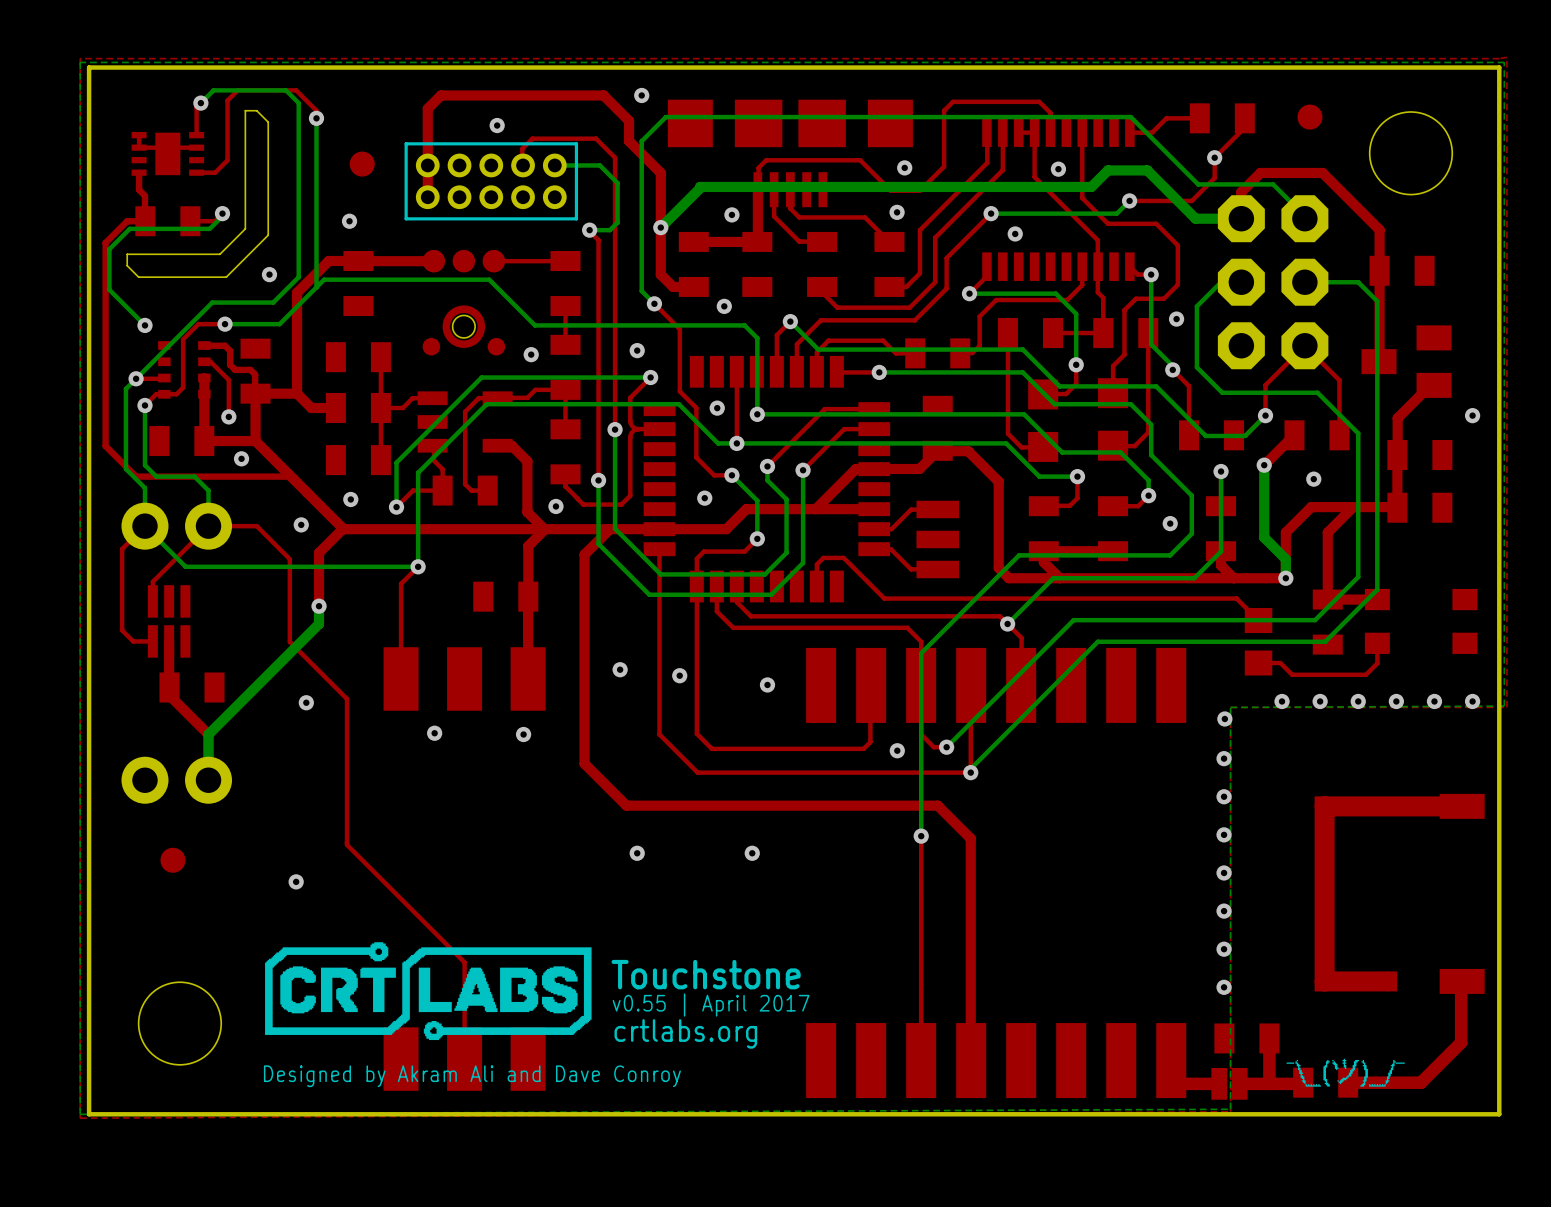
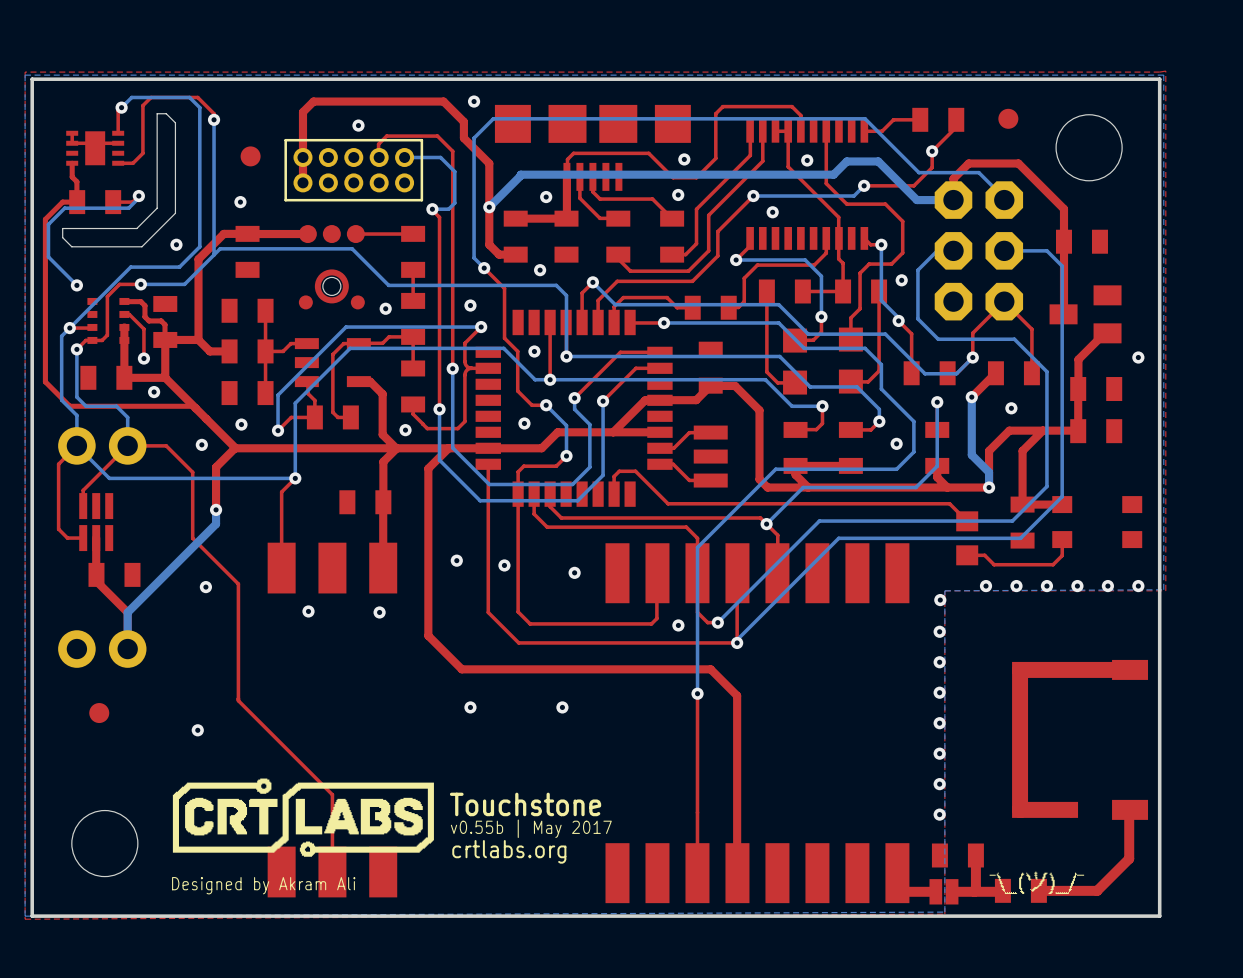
text: v0.55 | April 2017 (711, 1005) -> v0.55b | May 2017 (531, 828)
text: Designed by Akram Ali and Dave Conroy (472, 1076) -> Designed by Akram Ali (263, 885)

